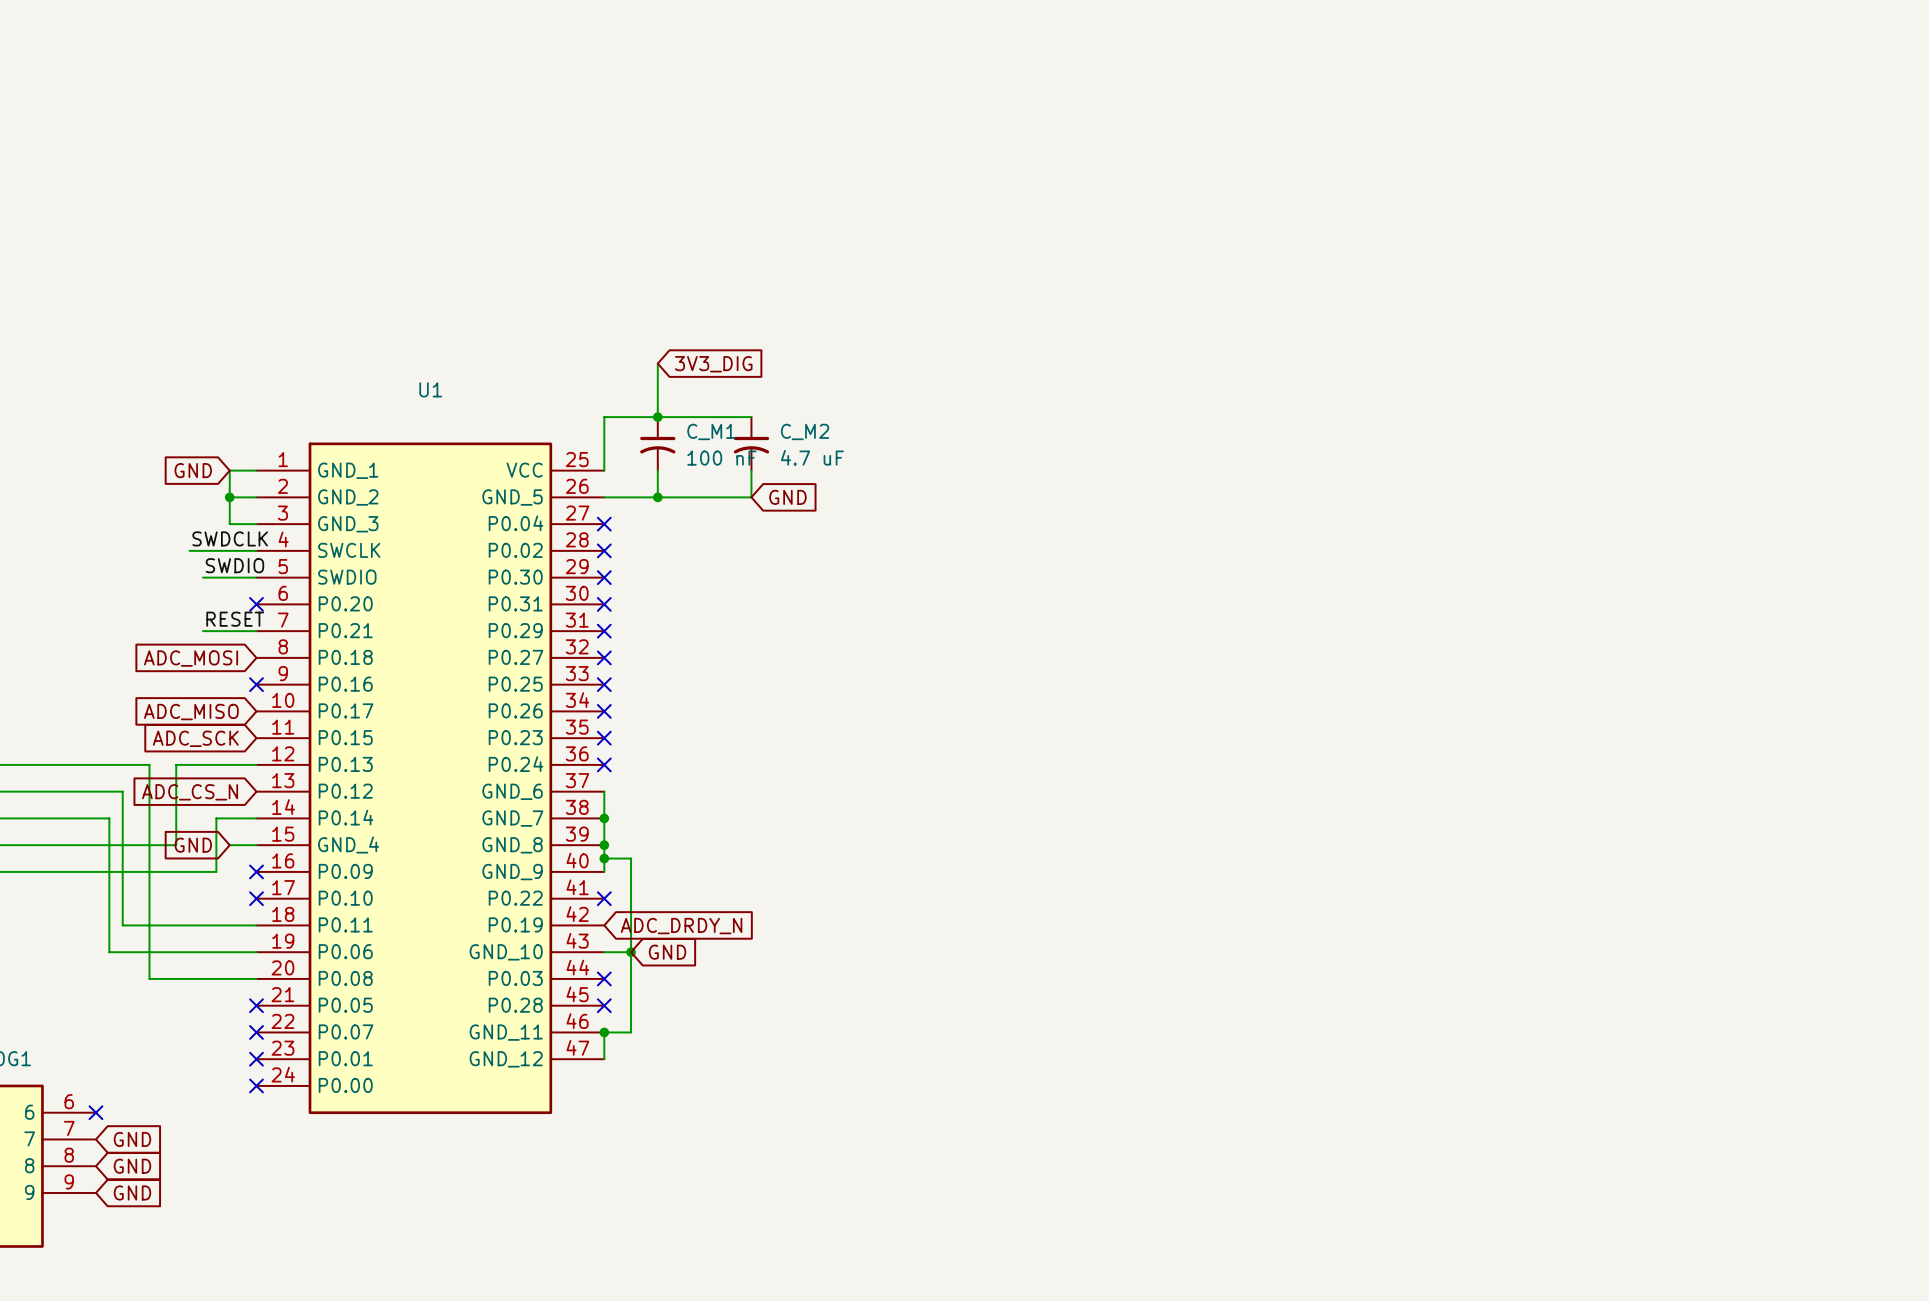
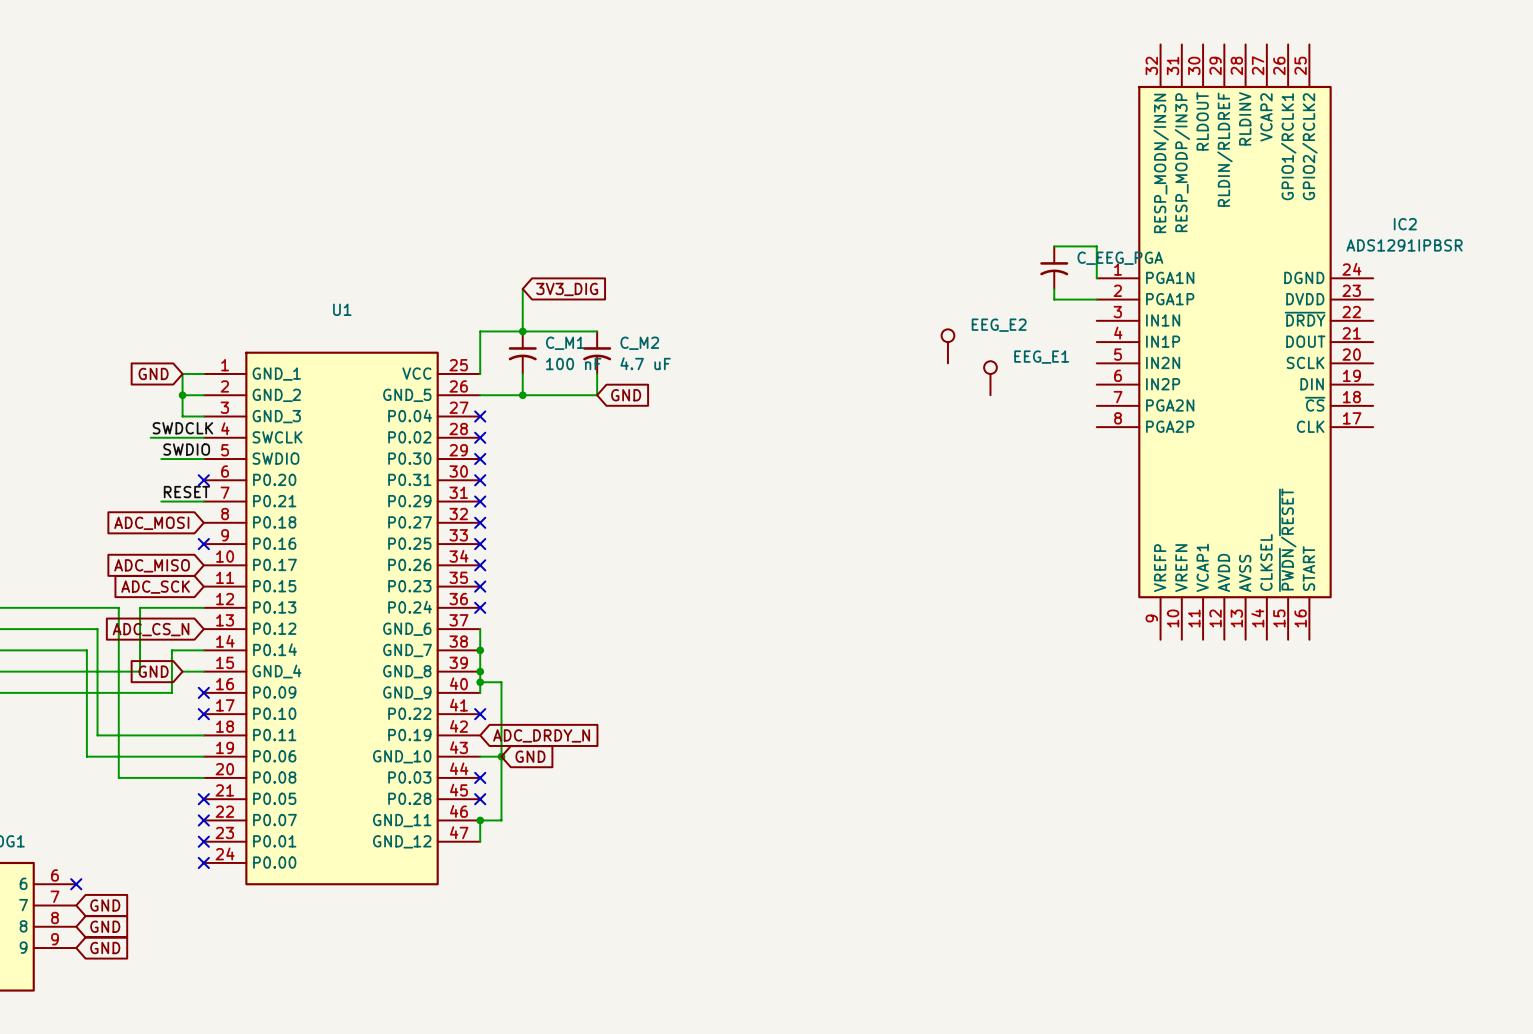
wire: none -> (1054, 246) (1096, 246) (1096, 278)
C_EEG_PGA: none -> (1054, 267)
wire: none -> (1054, 288) (1054, 299) (1096, 299)
IC2: none -> ADS1291IPBSR (1234, 342)
EEG_E2: none -> (947, 346)
EEG_E1: none -> (990, 378)

